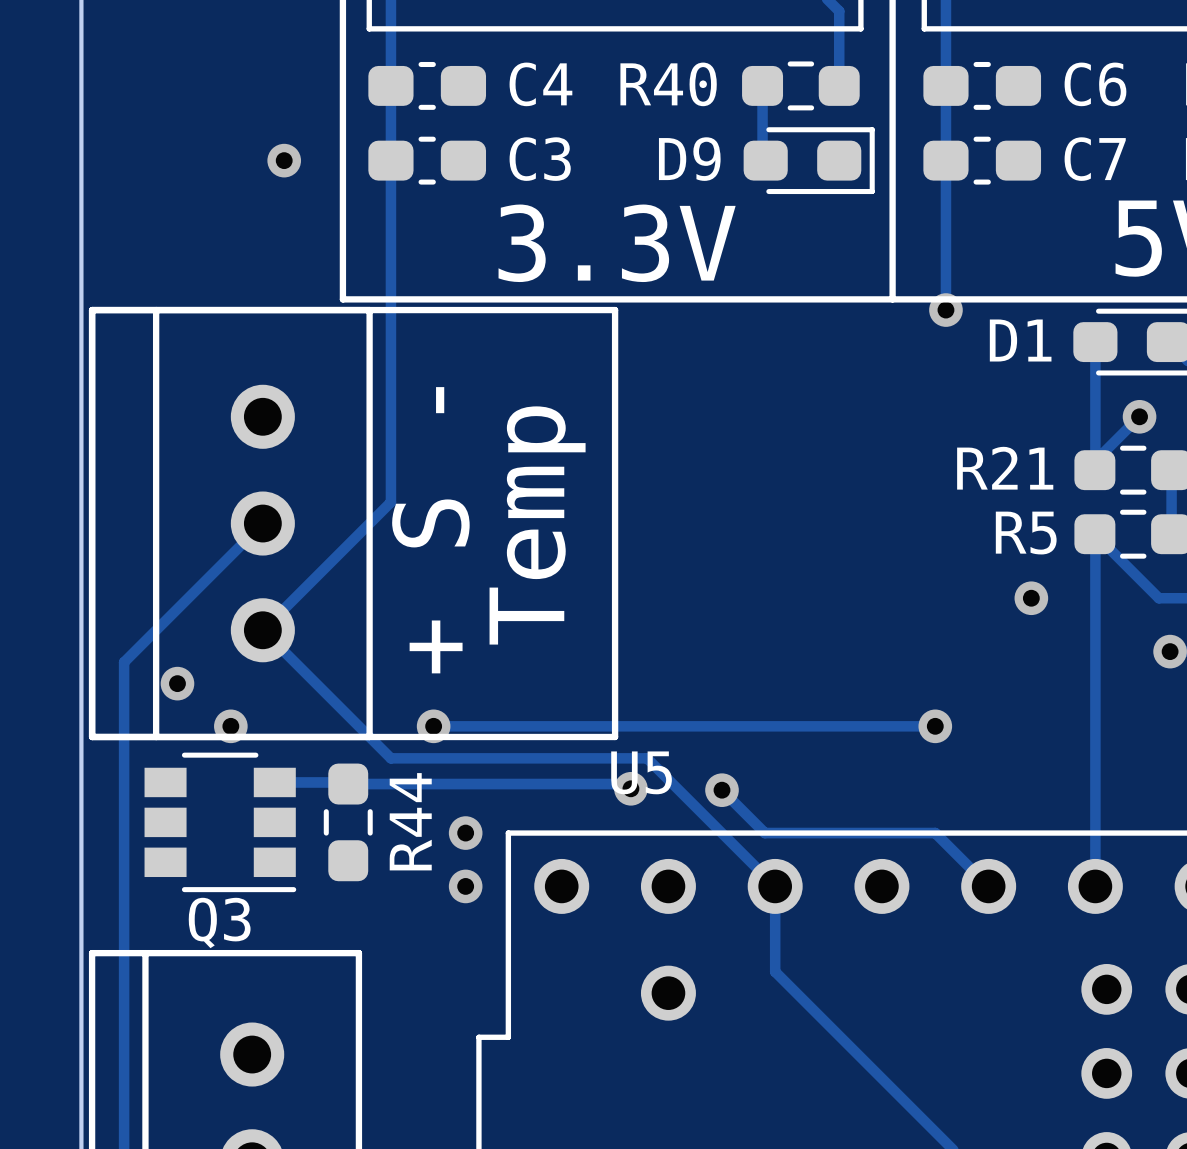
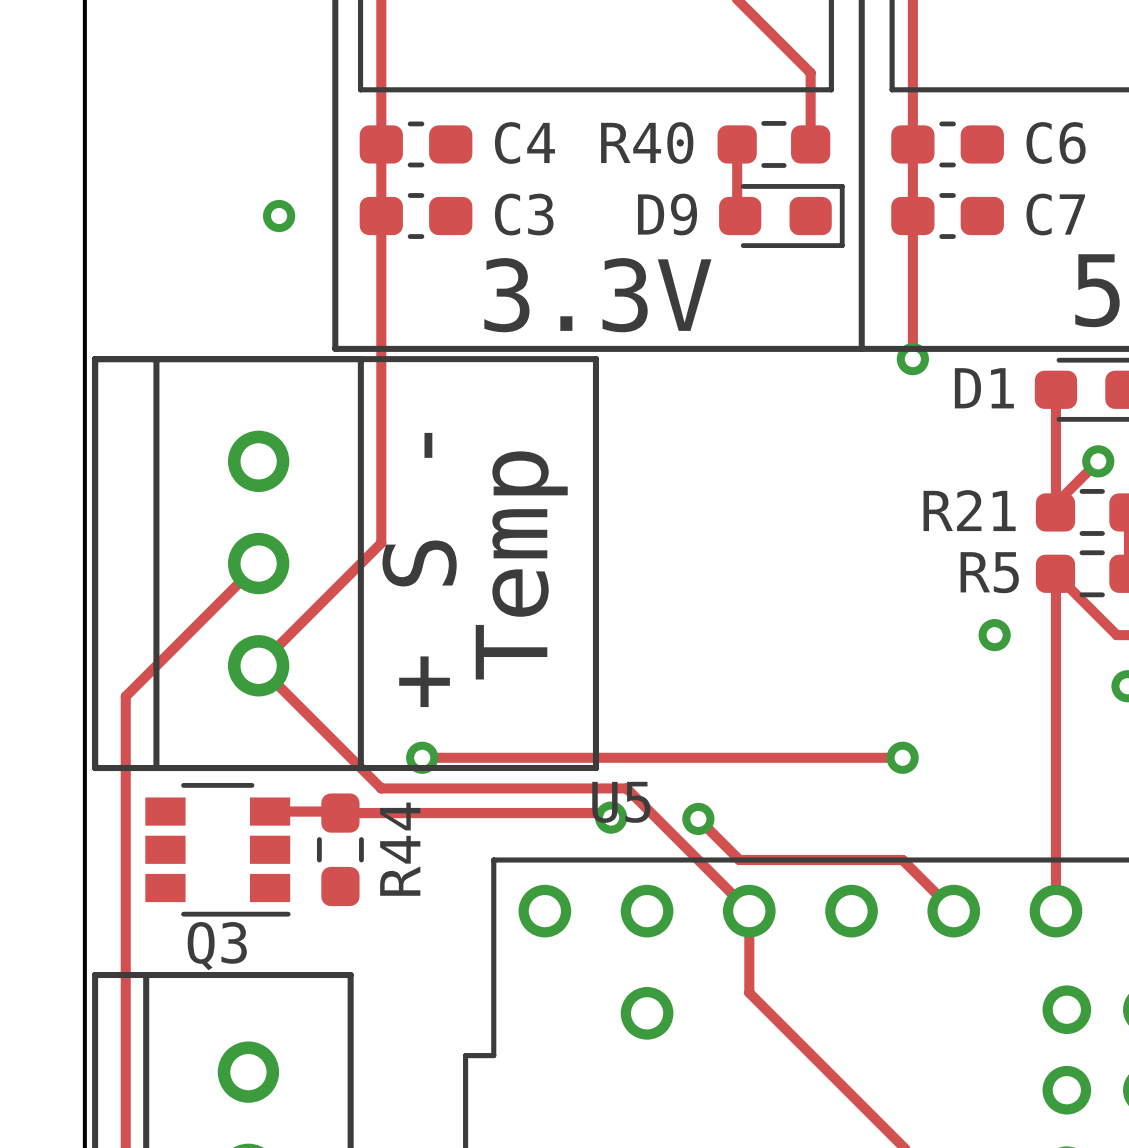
via: (177, 683) -> none
via: (230, 726) -> none
via: (465, 833) -> none
via: (465, 886) -> none

